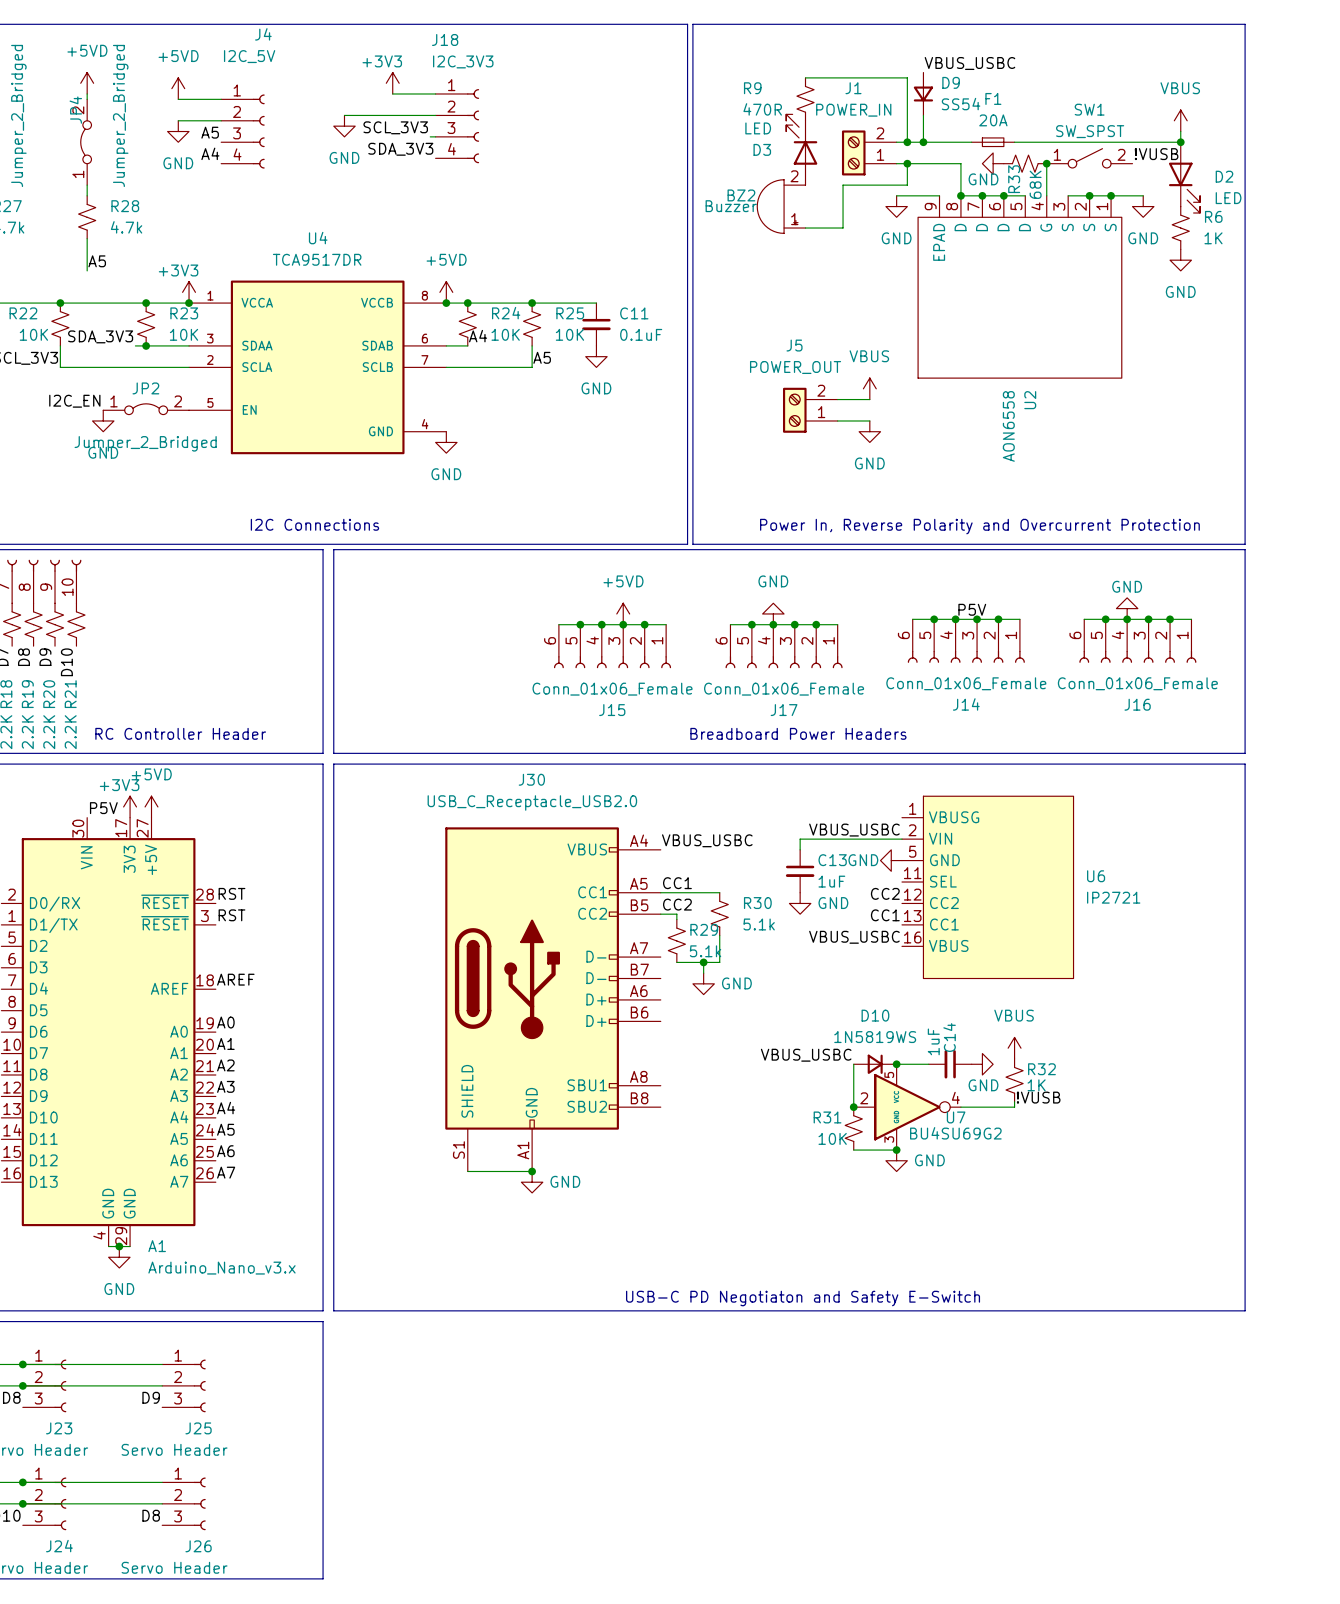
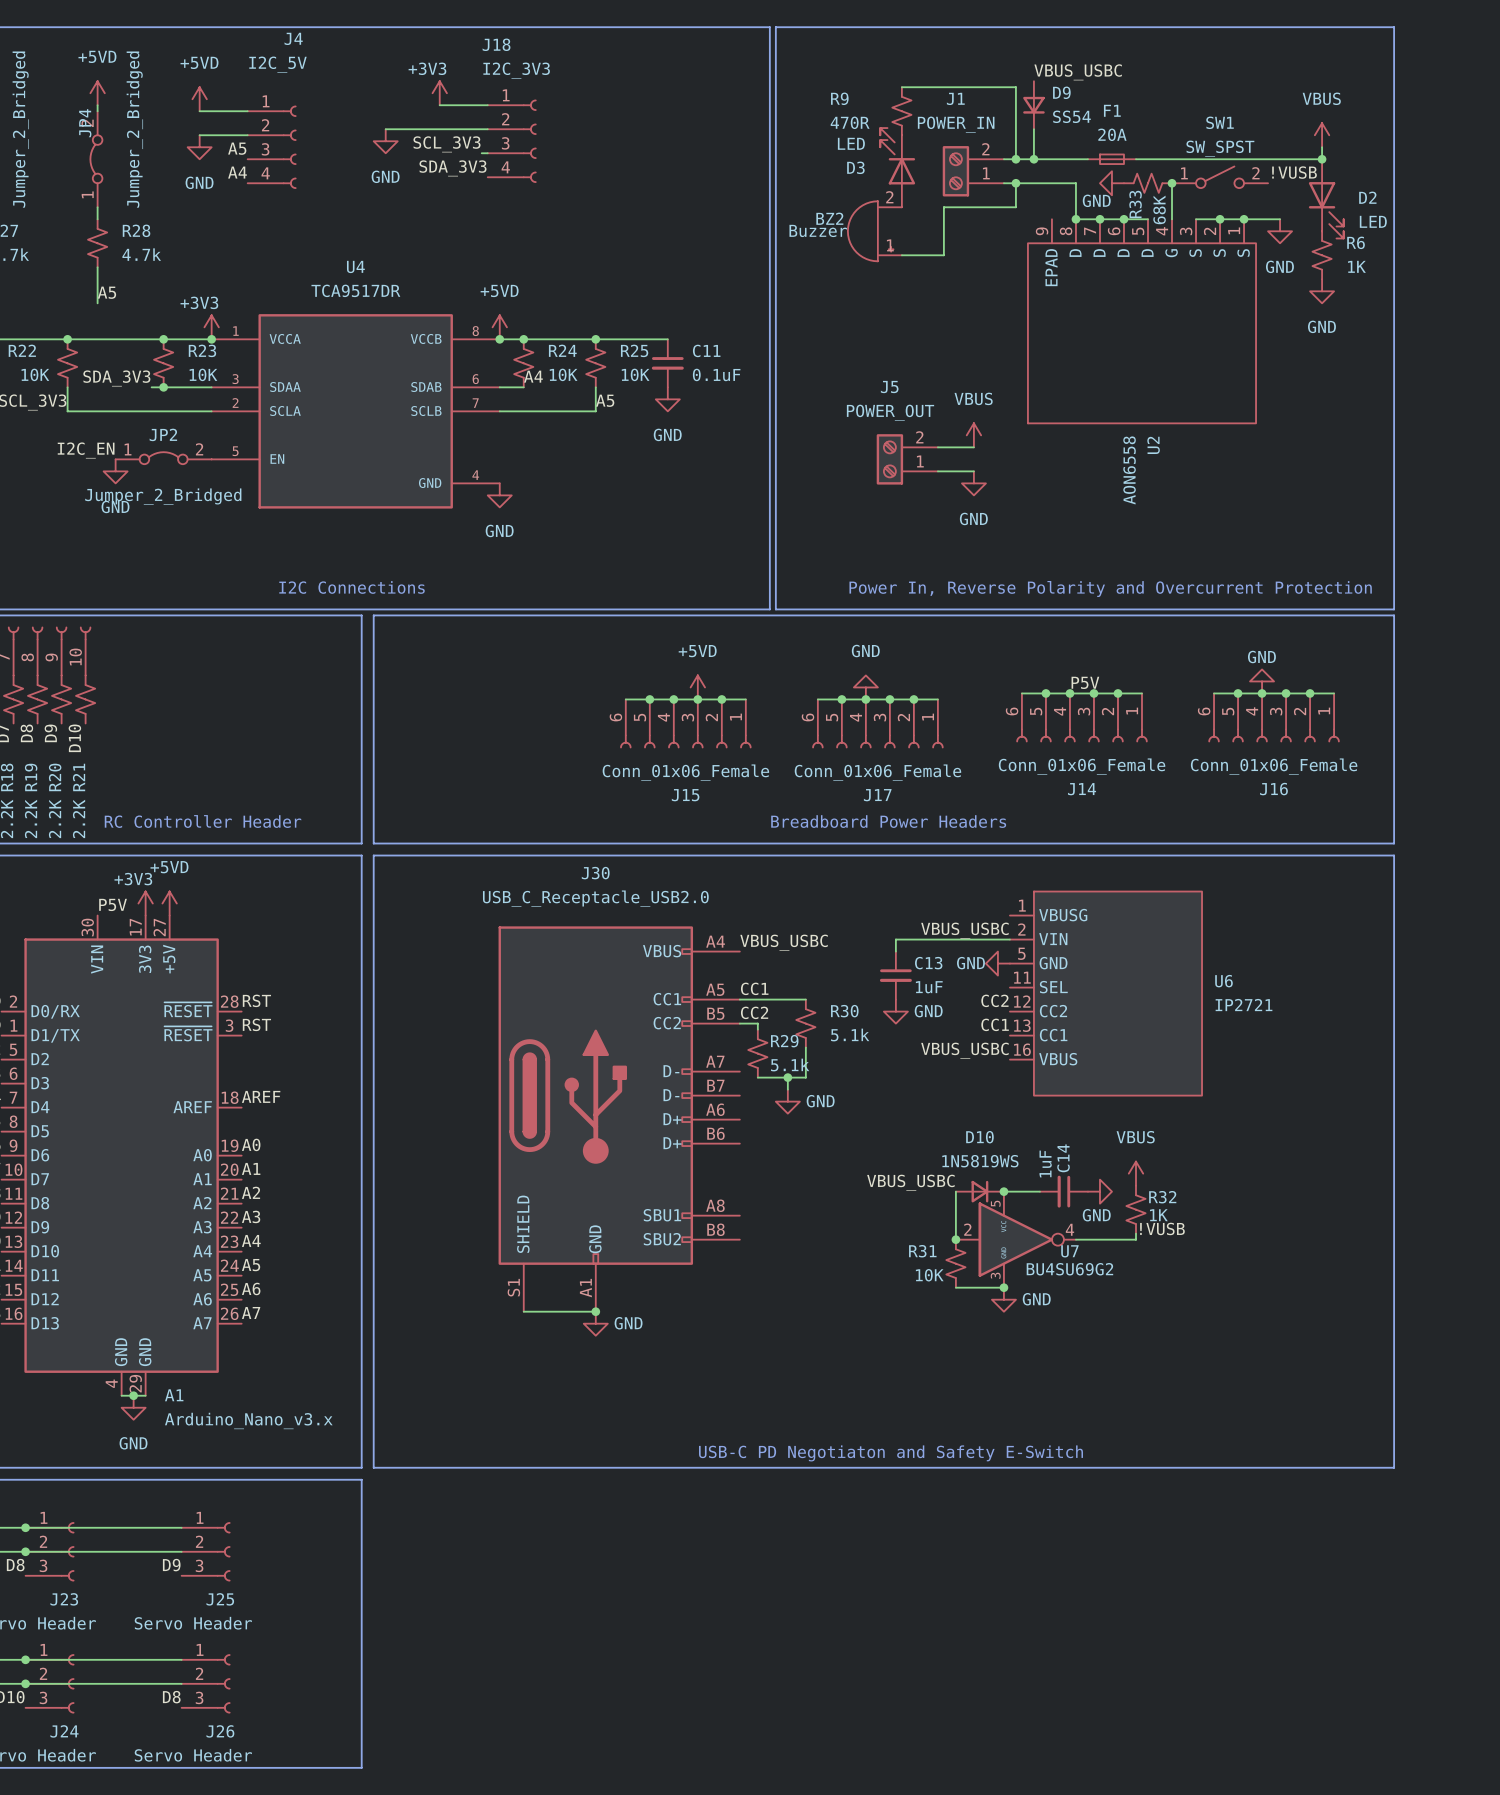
wire: (896, 195) (939, 195) -> none
power symbol: GND (896, 206) -> none

